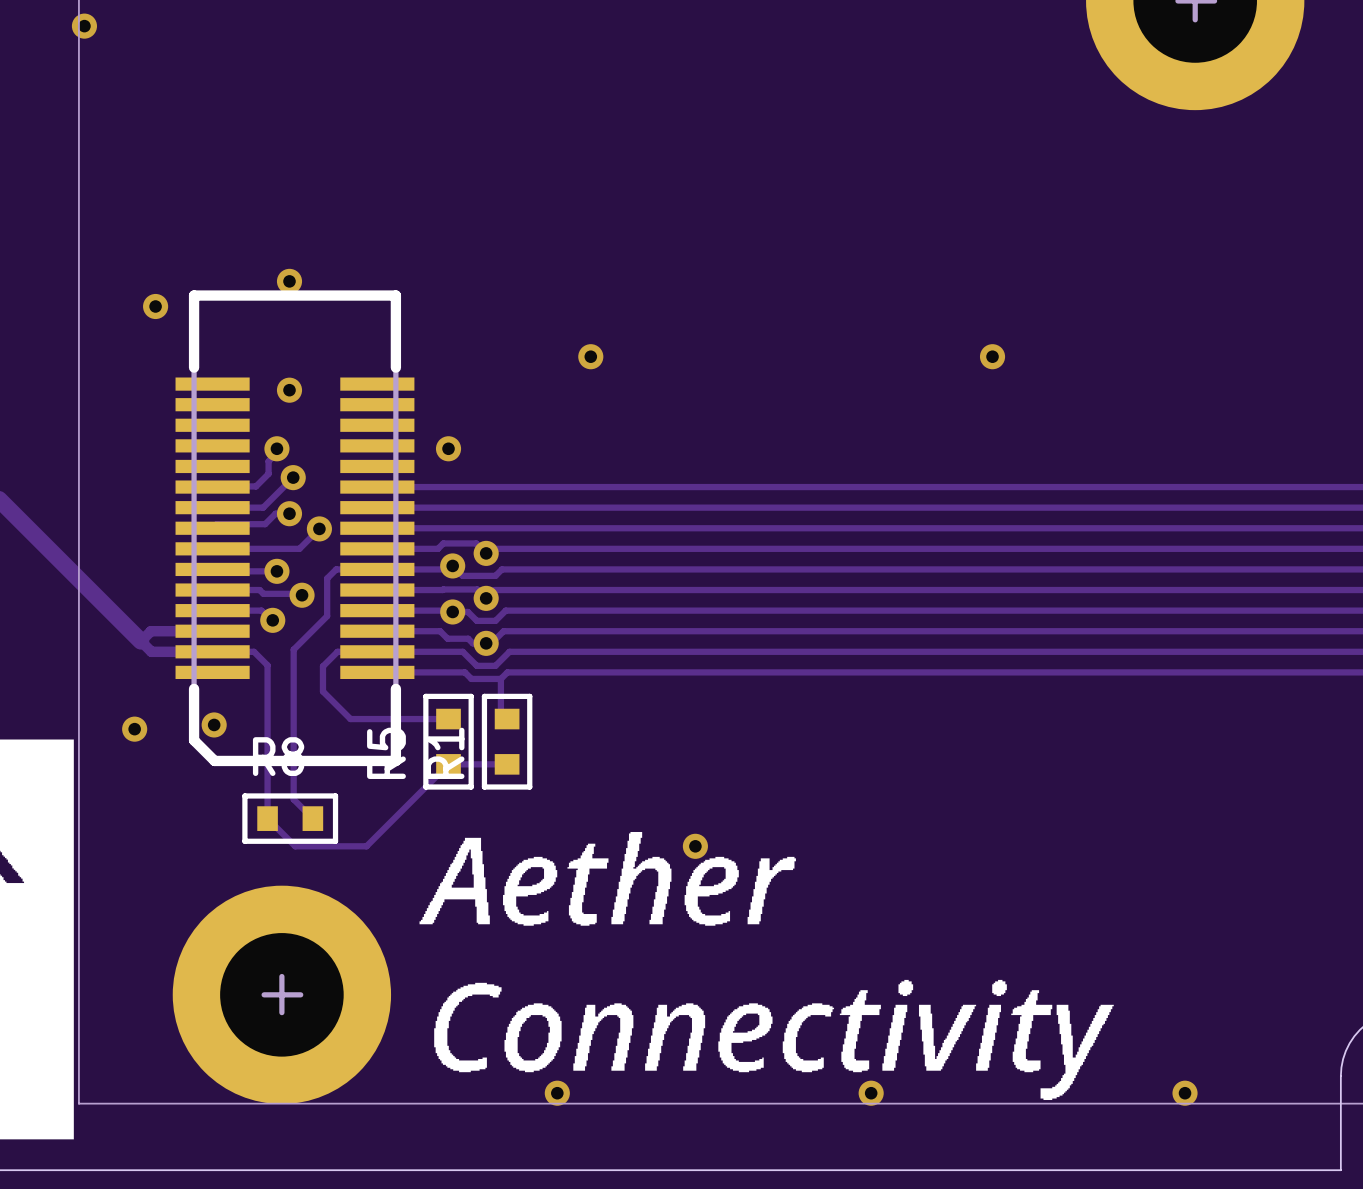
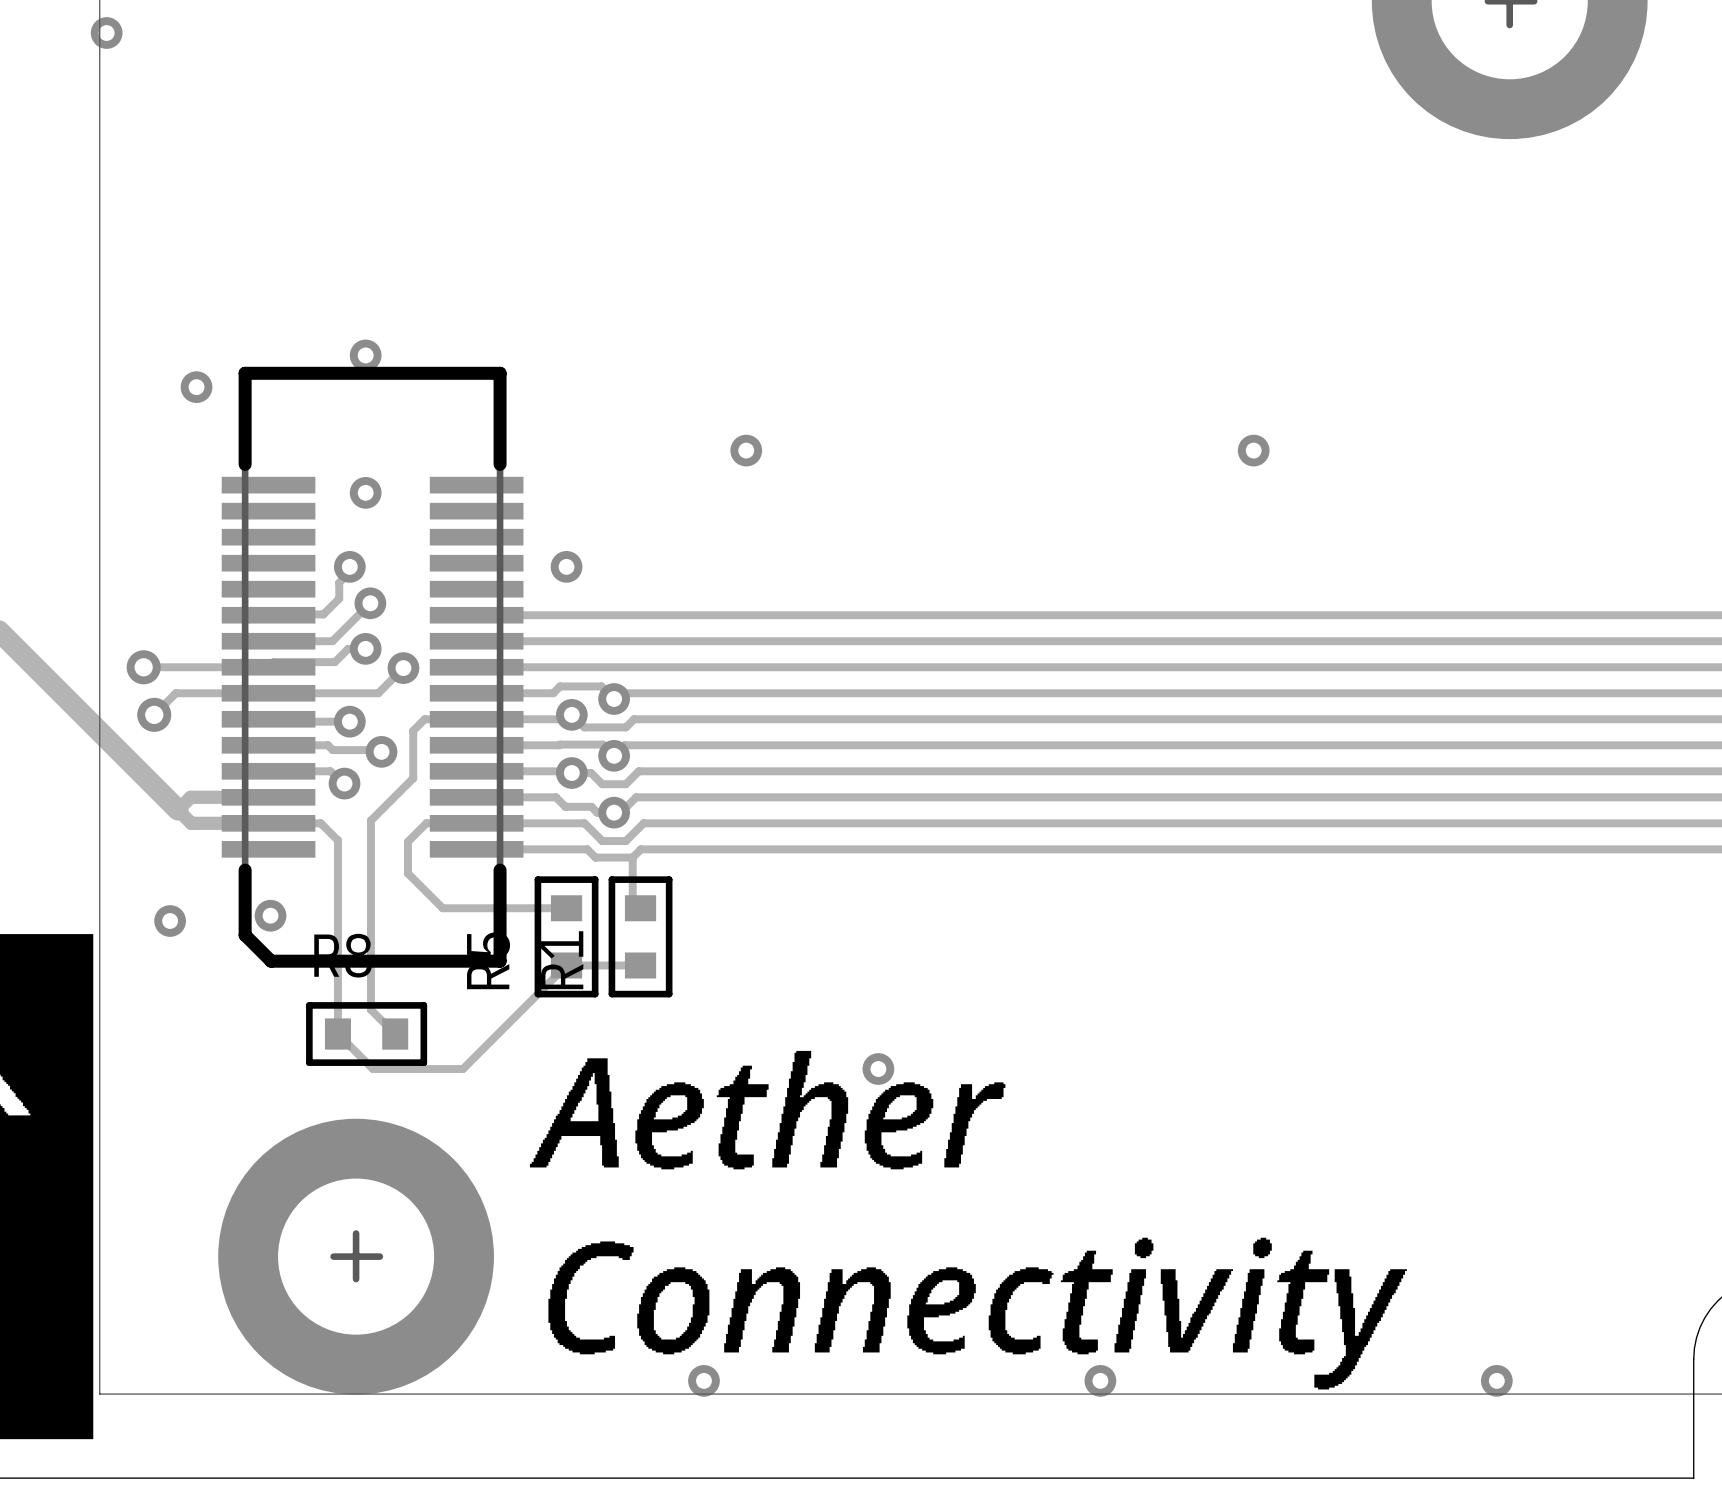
track: none -> (143, 667) (268, 667)
via: none -> (143, 667)
track: none -> (268, 693) (175, 693) (154, 714)
via: none -> (154, 714)

